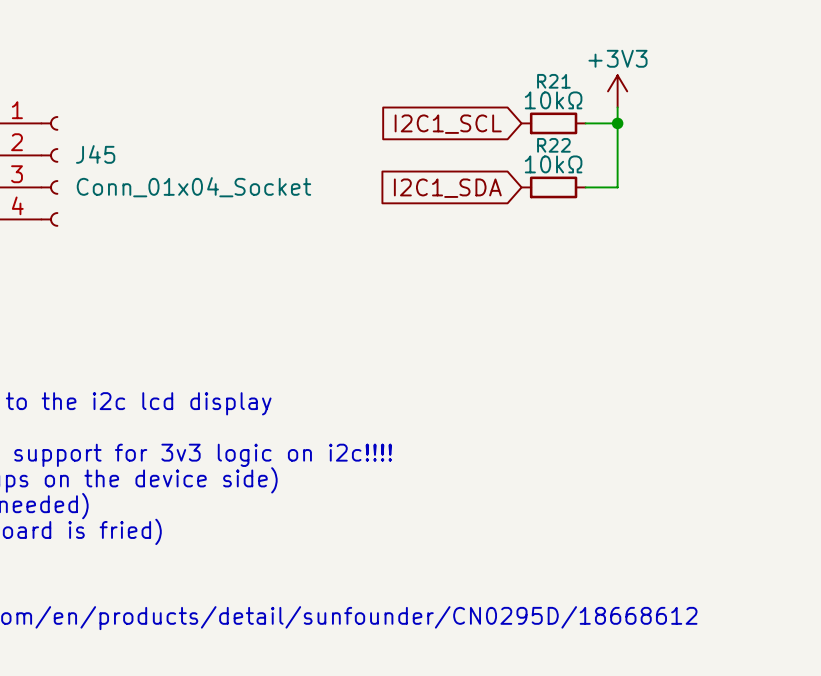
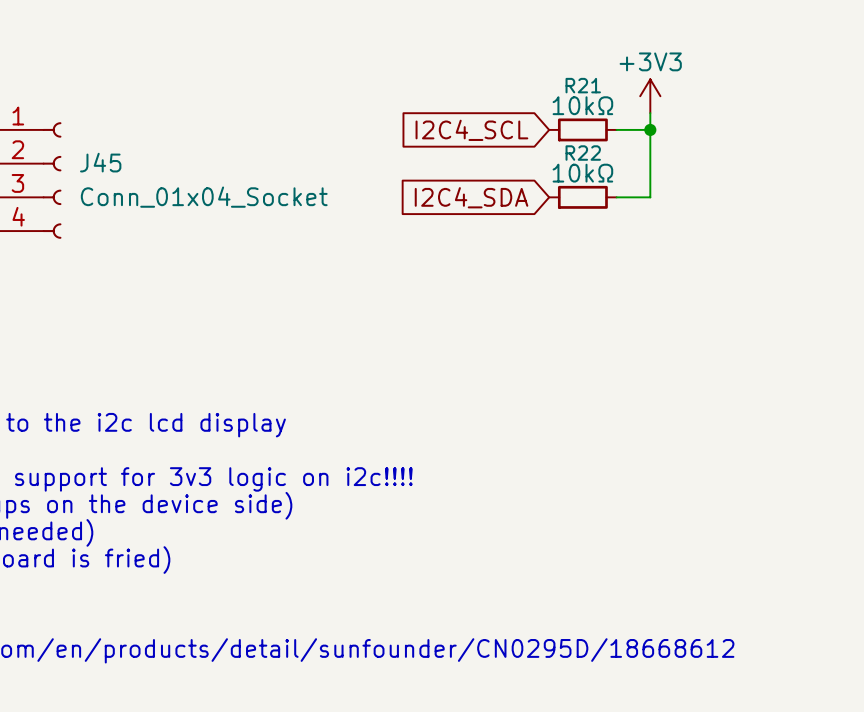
global label: I2C1_SCL (448, 124) -> I2C4_SCL (471, 130)
global label: I2C1_SDA (447, 188) -> I2C4_SDA (471, 197)

